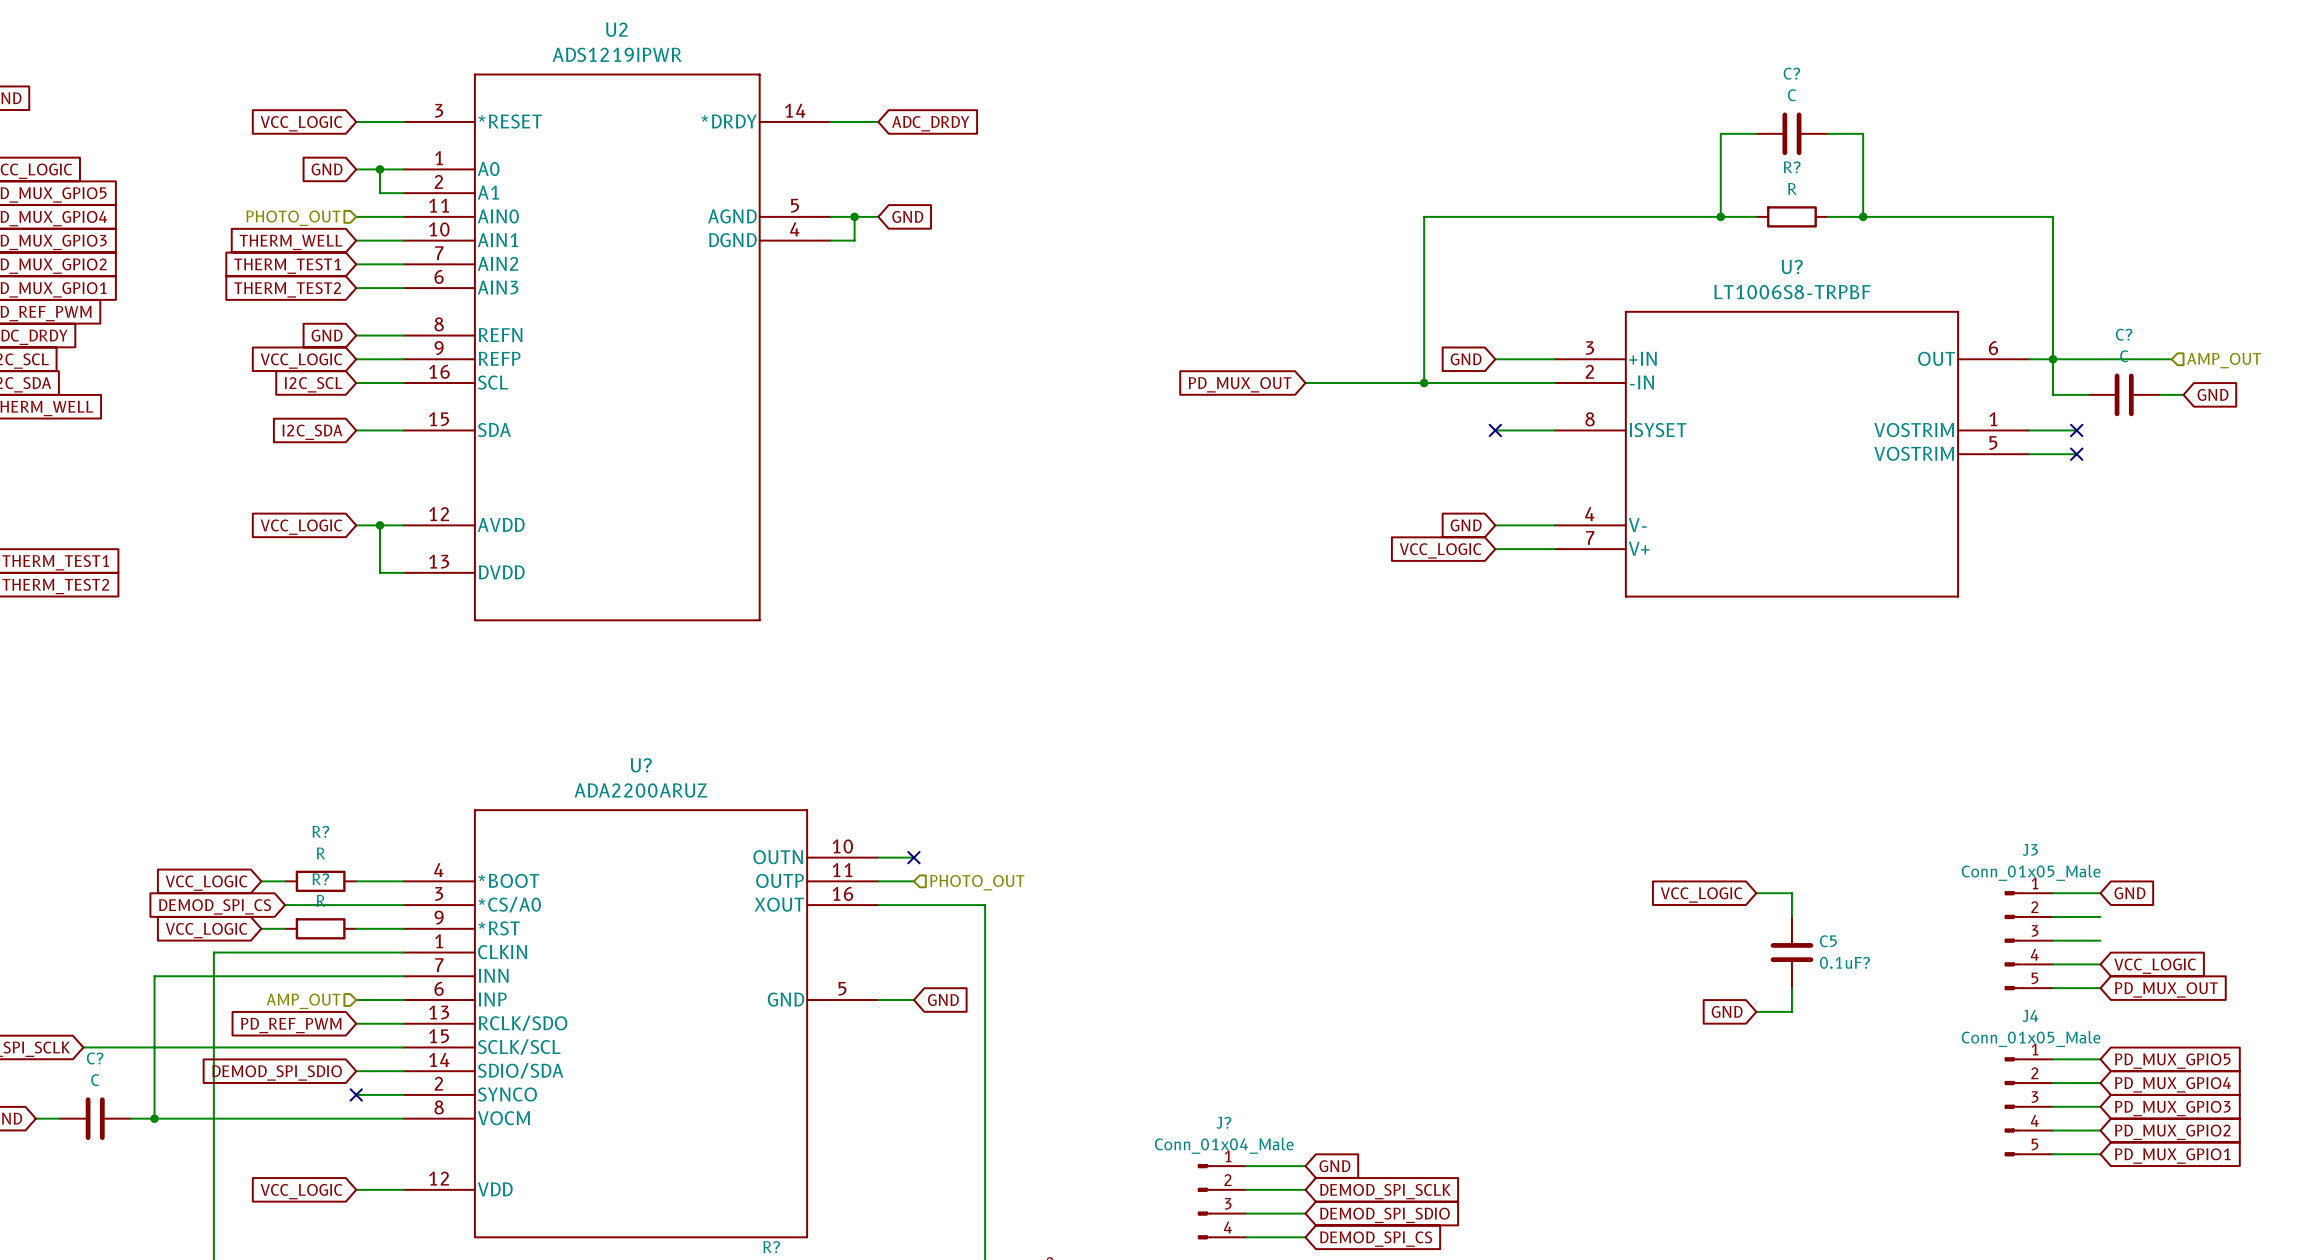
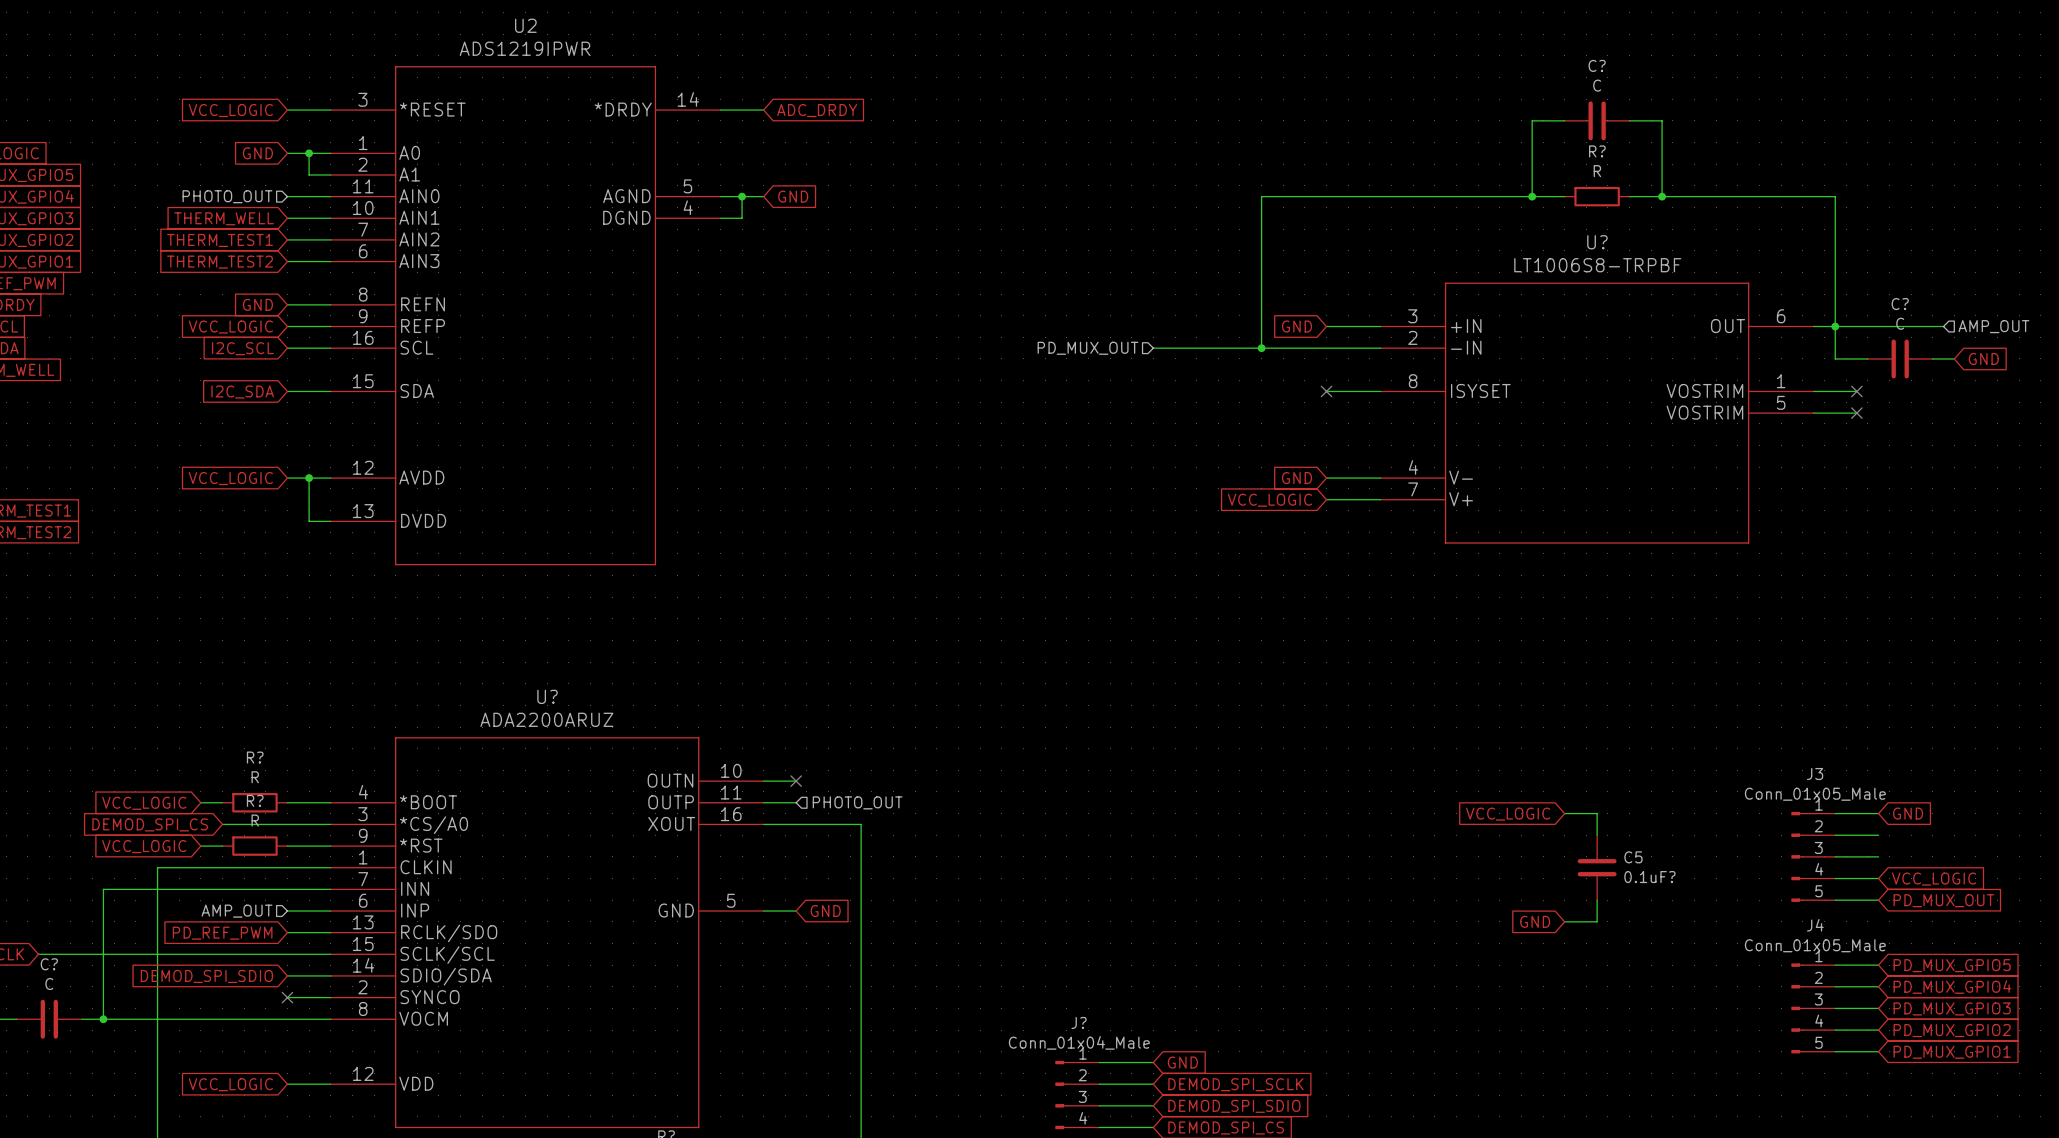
hierarchical label: none -> PD_MUX_OUT (1087, 348)
global label: PD_MUX_OUT (1240, 384) -> none

